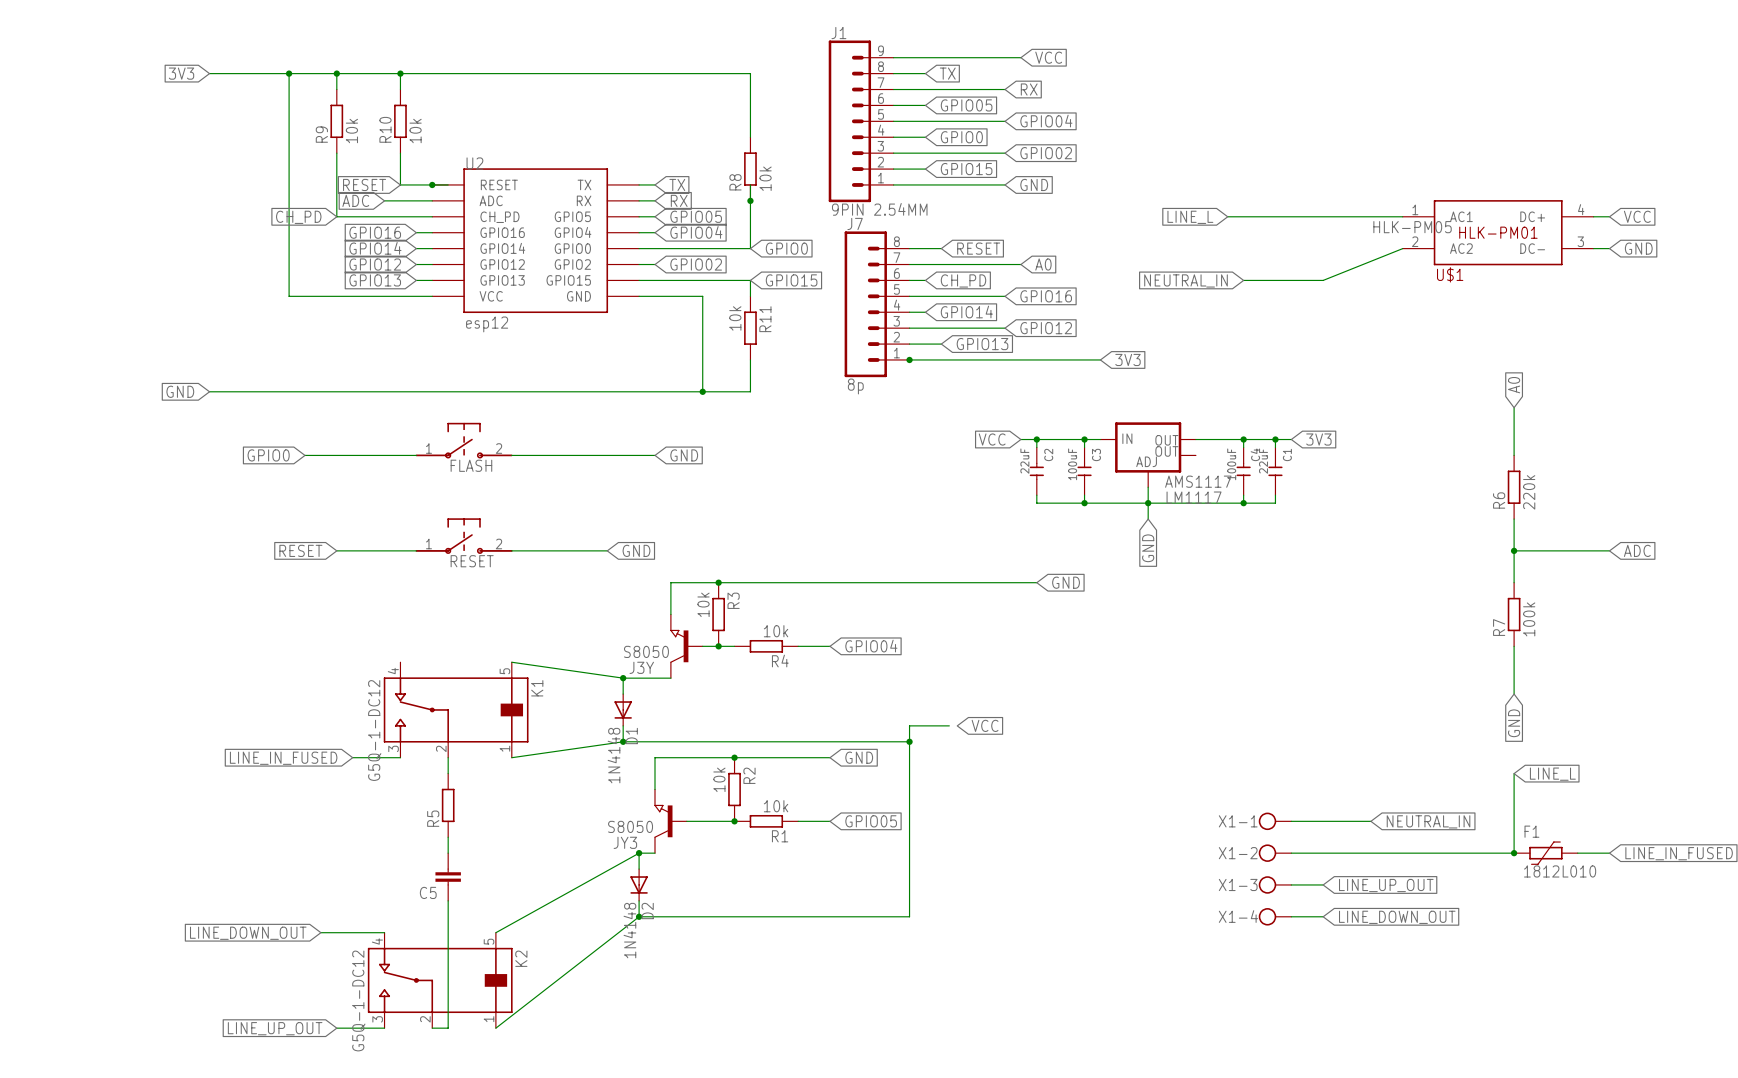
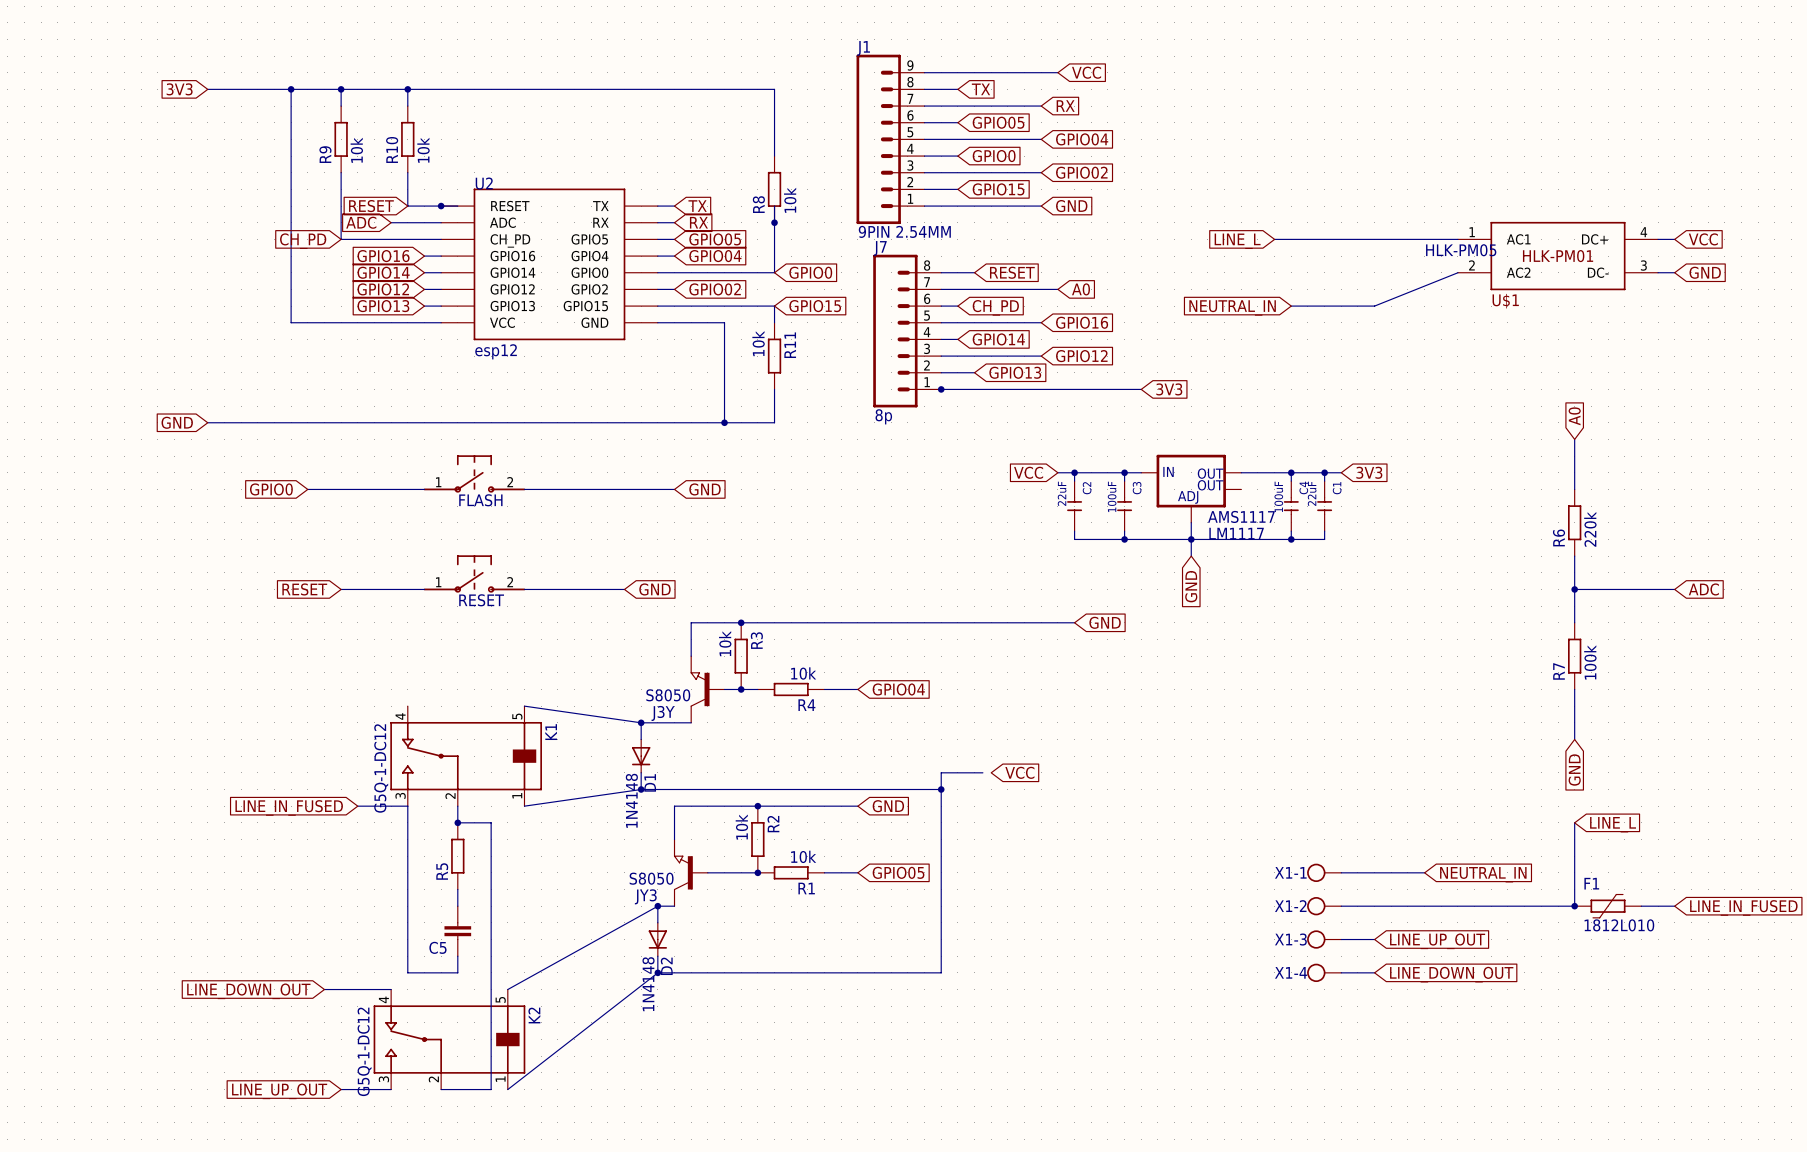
wire: none -> (407, 806) (407, 972) (457, 972)
junction: none -> (457, 822)
wire: (448, 916) (448, 1028) -> (457, 822) (491, 822) (491, 1089) (457, 1089)

